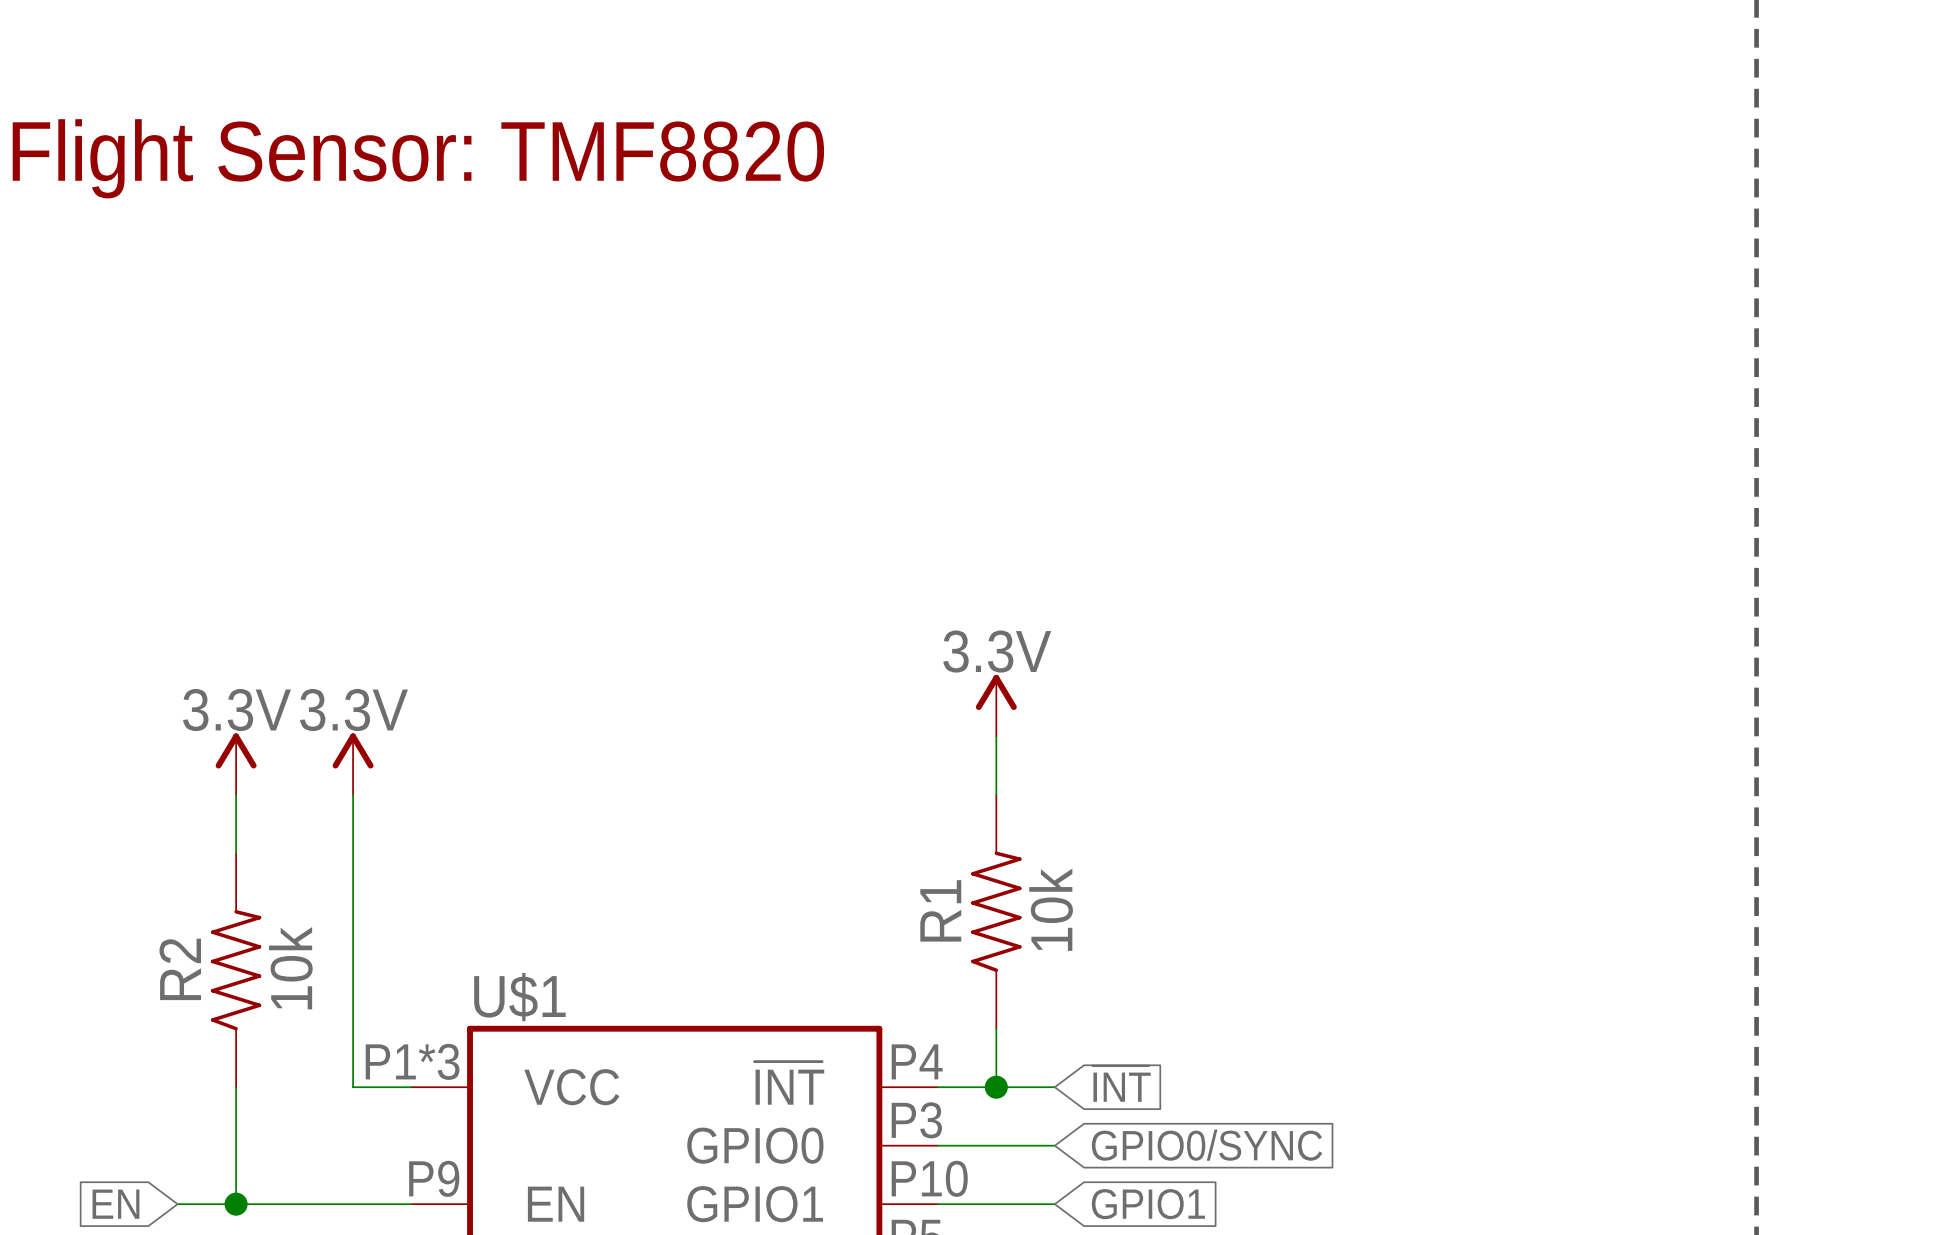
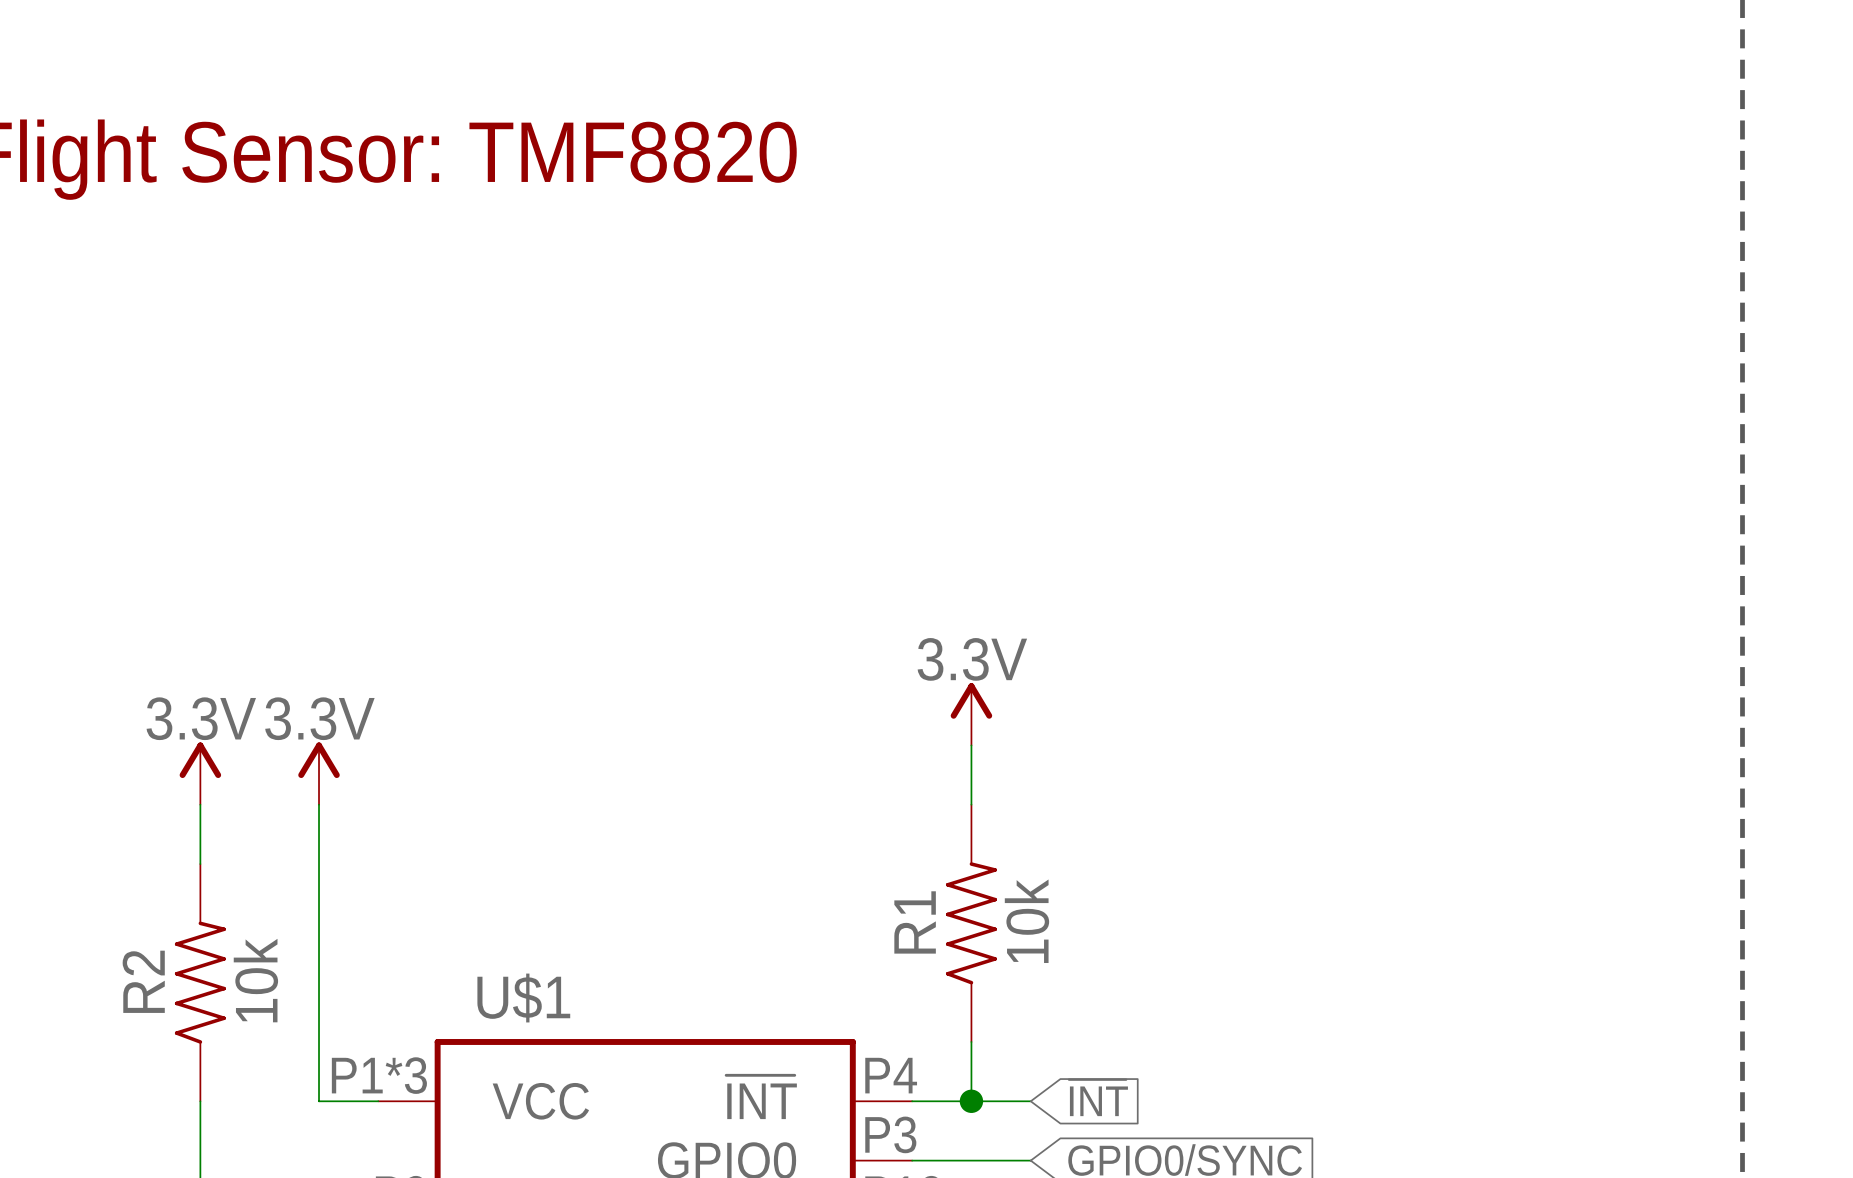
U$1 name position: U$1 (519, 997) -> U$1 (523, 998)

